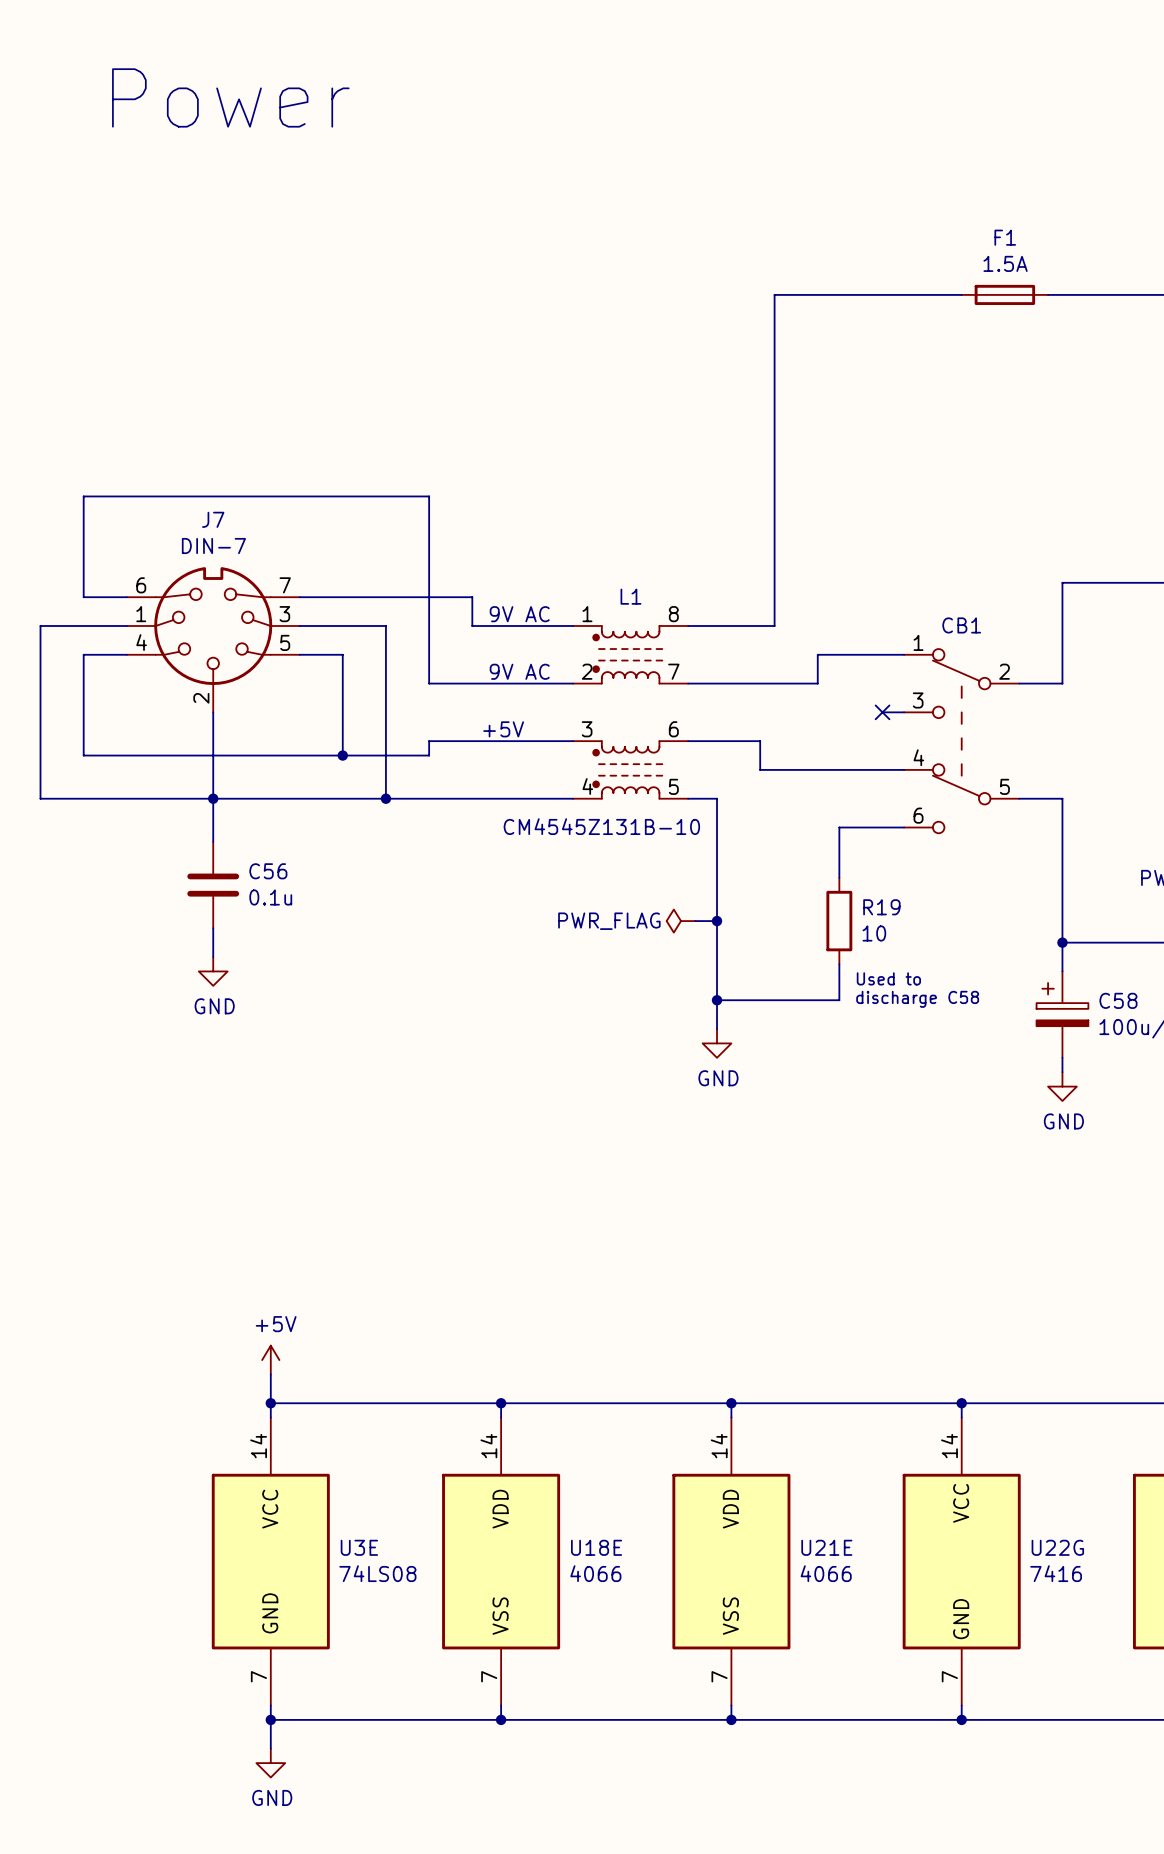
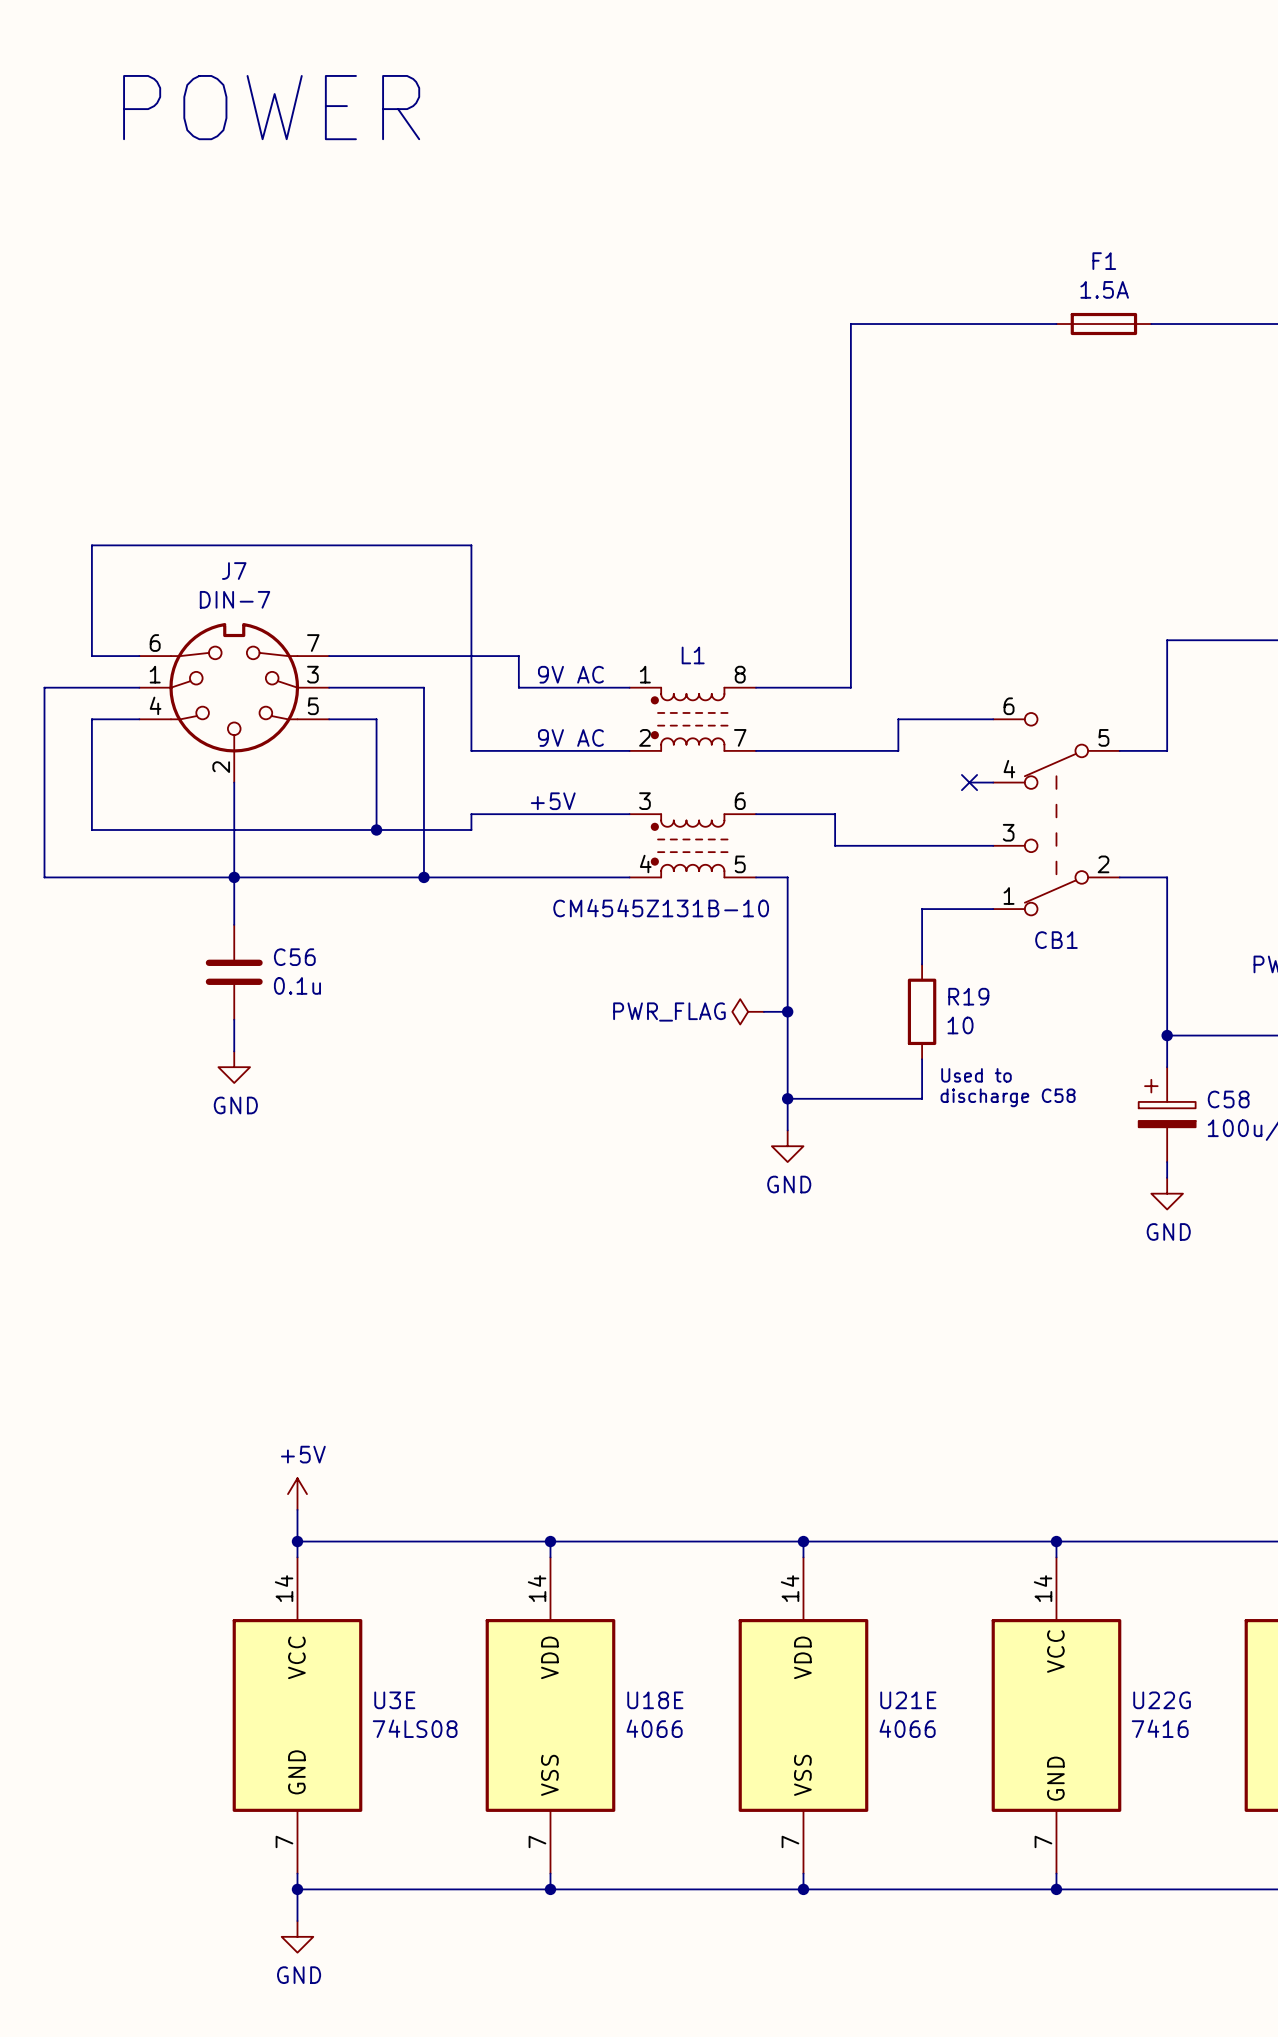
text: Power (230, 97) -> POWER (271, 107)
CB1 flip: as is (961, 741) -> up-down (1056, 814)

